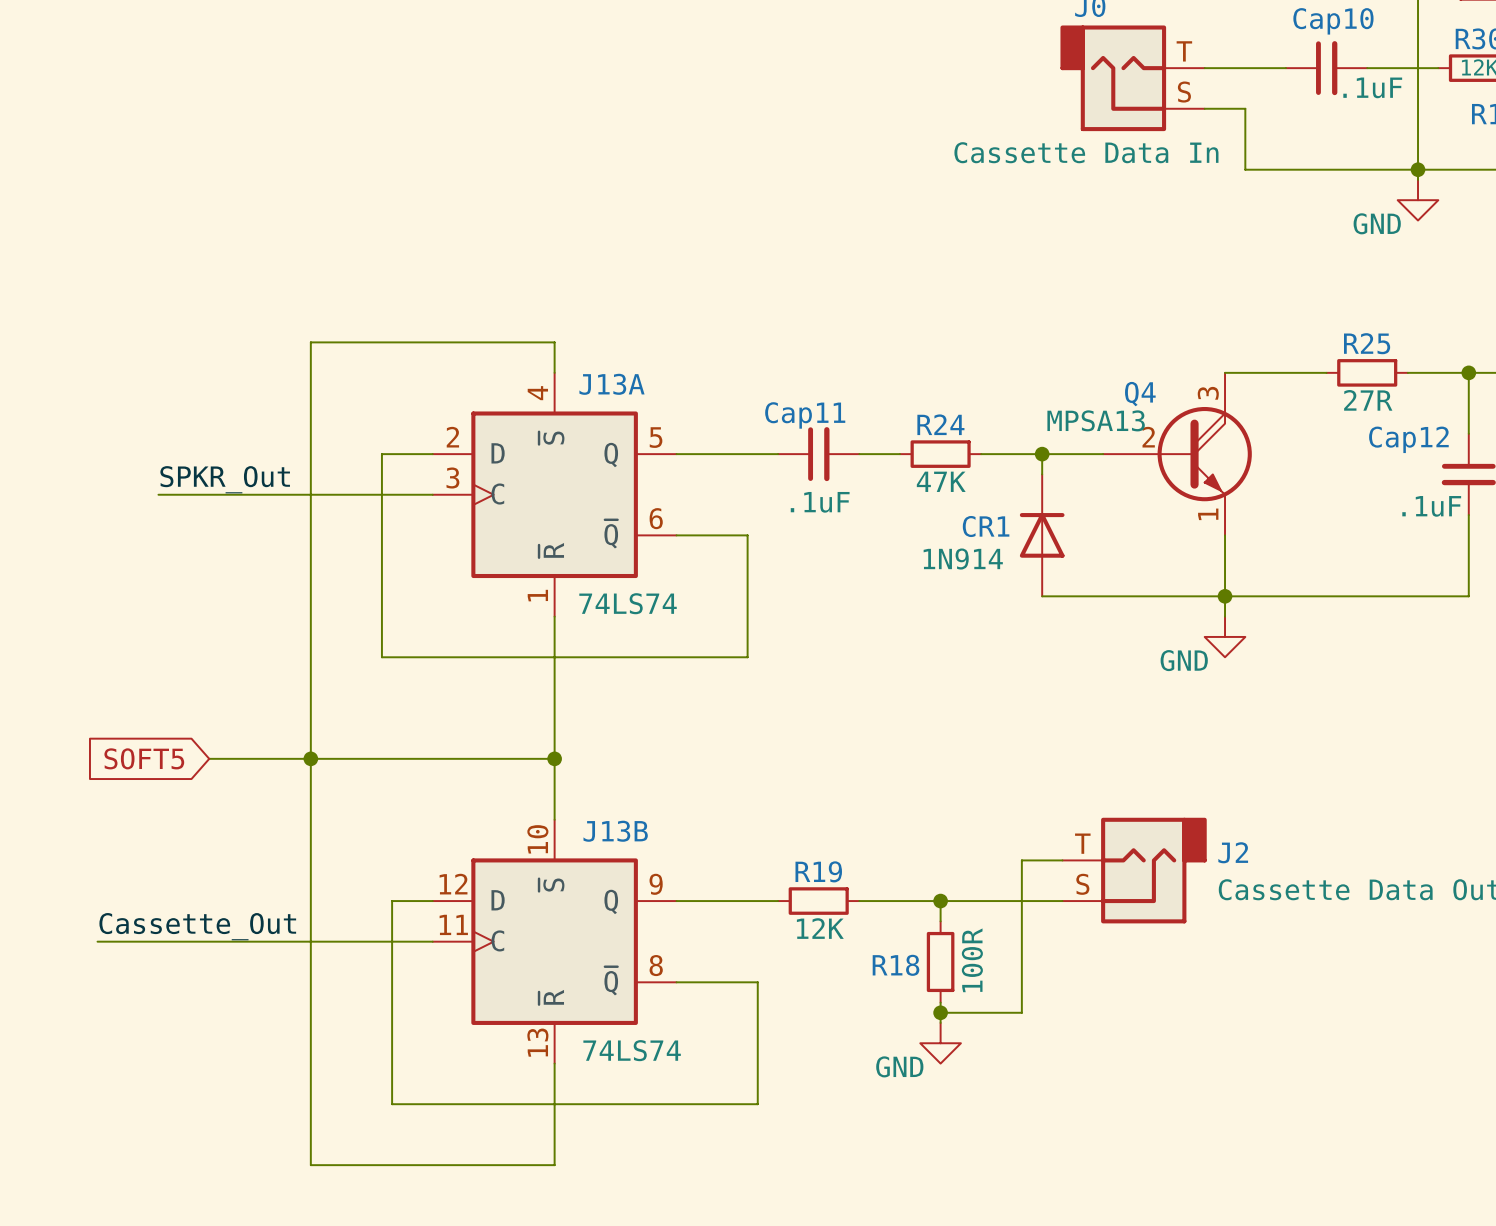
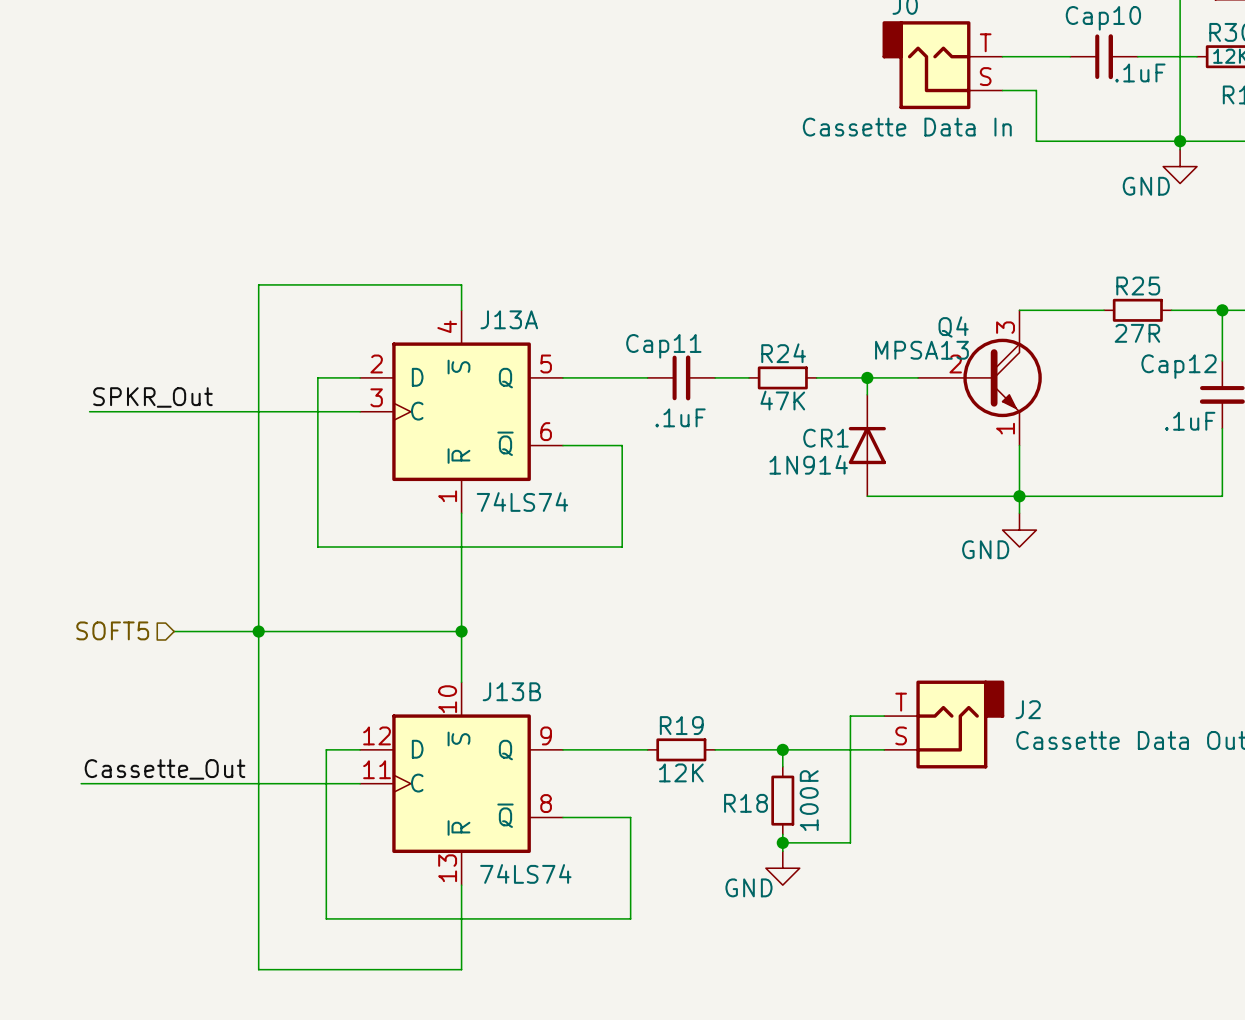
label position: SPKR_Out (225, 479) -> SPKR_Out (152, 397)
wire: none -> (89, 411) (131, 411)
hierarchical label: none -> SOFT5 (112, 630)
global label: SOFT5 (144, 758) -> none

